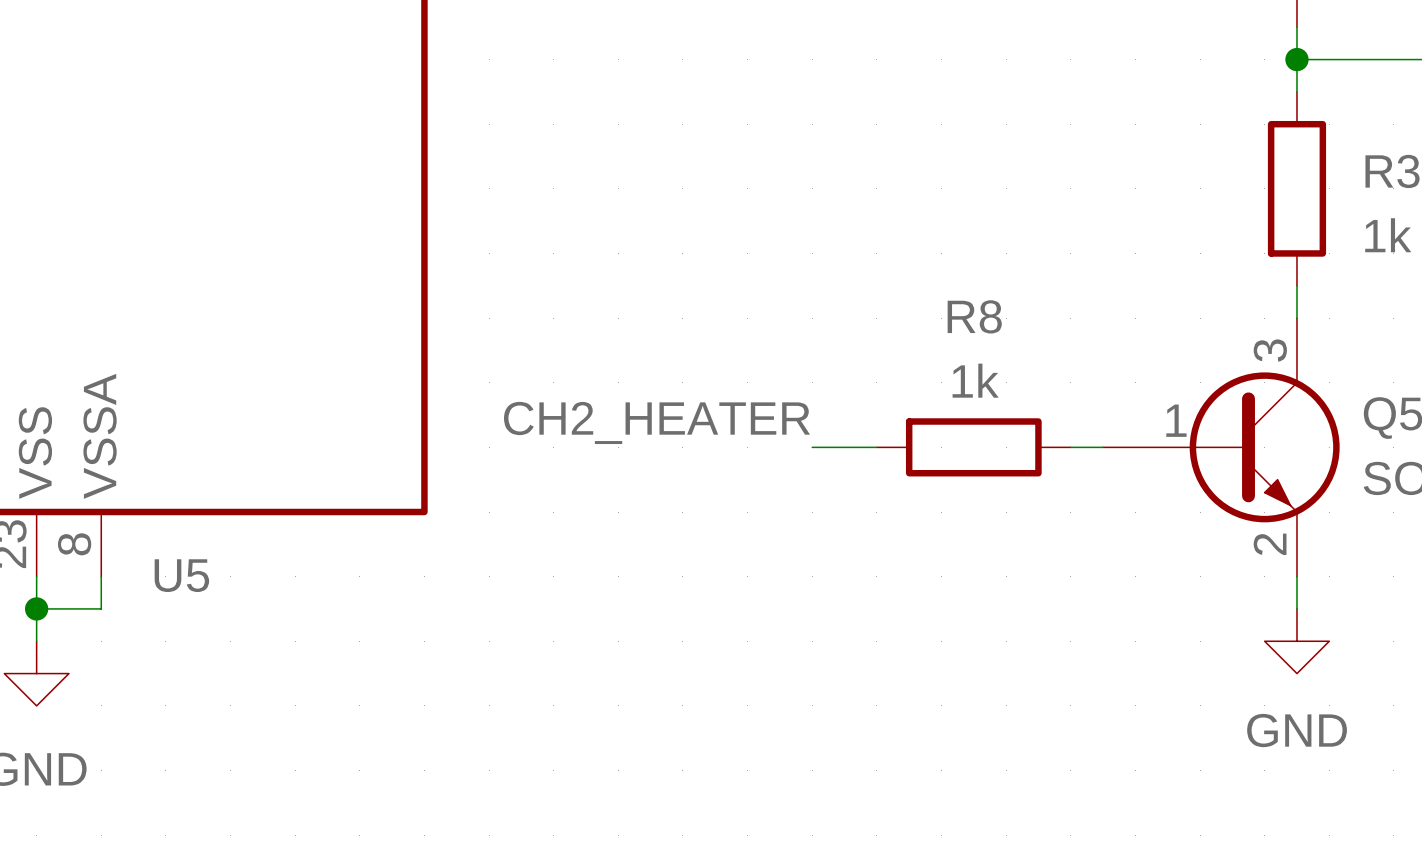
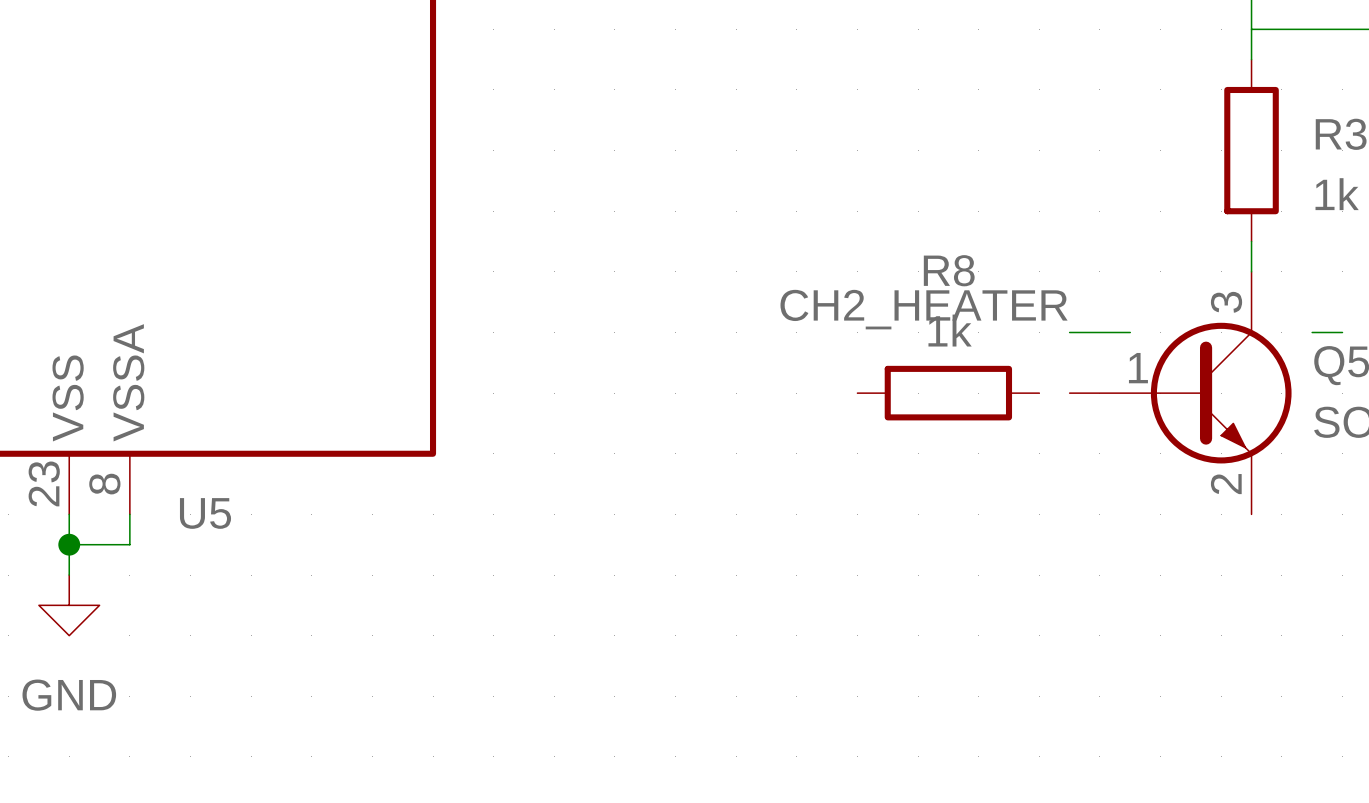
junction: (1296, 59) -> none
label position: CH2_HEATER (657, 422) -> CH2_HEATER (924, 309)
wire: (812, 447) (876, 447) -> (1069, 332) (1130, 332)
wire: (1070, 447) (1103, 447) -> (1312, 332) (1342, 332)
wire: (1296, 576) (1296, 608) -> none
power symbol: GND (1296, 641) -> none

